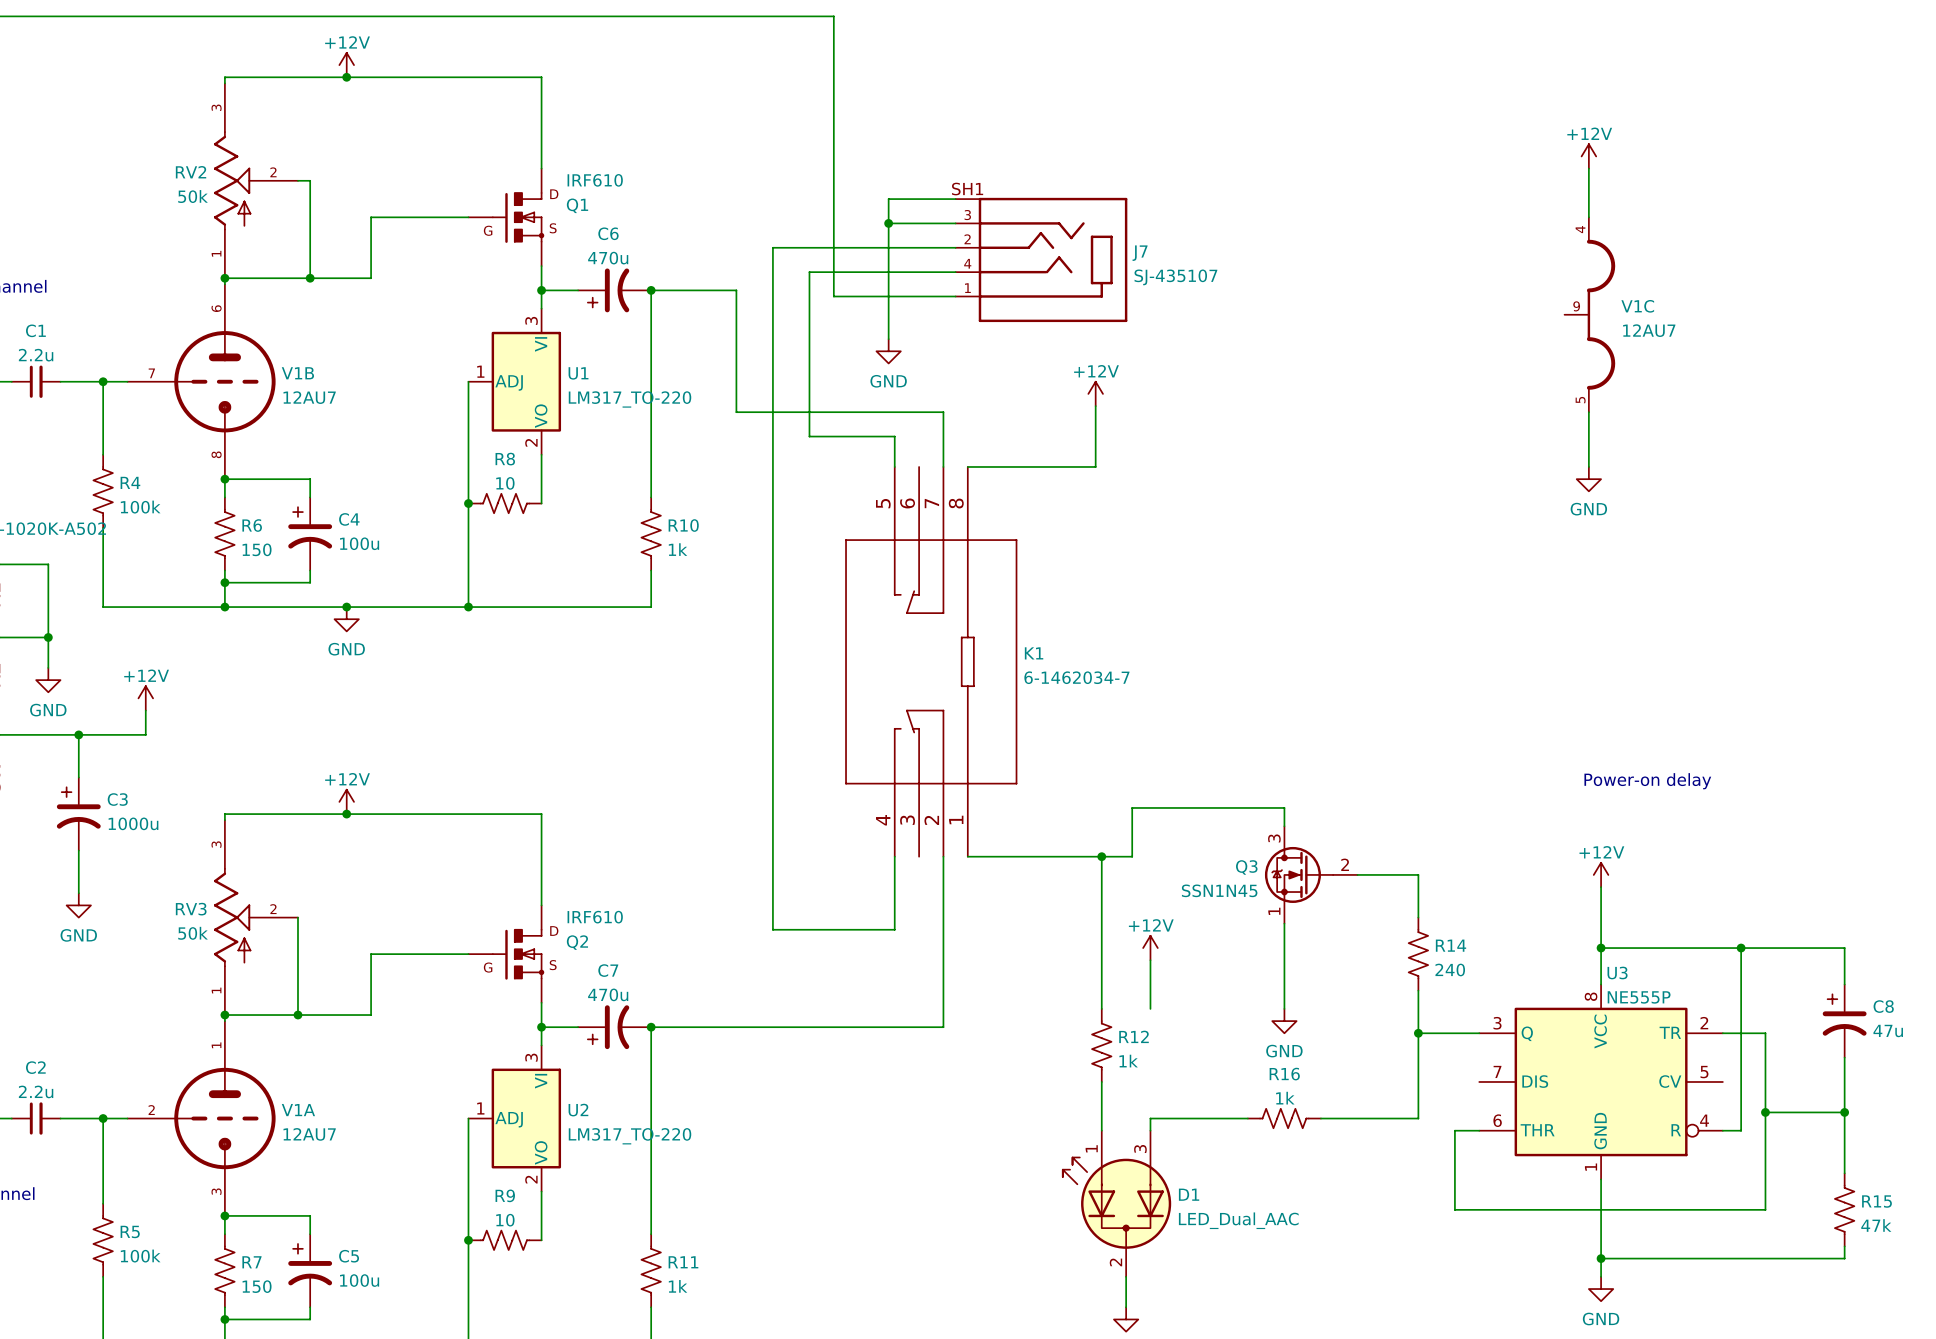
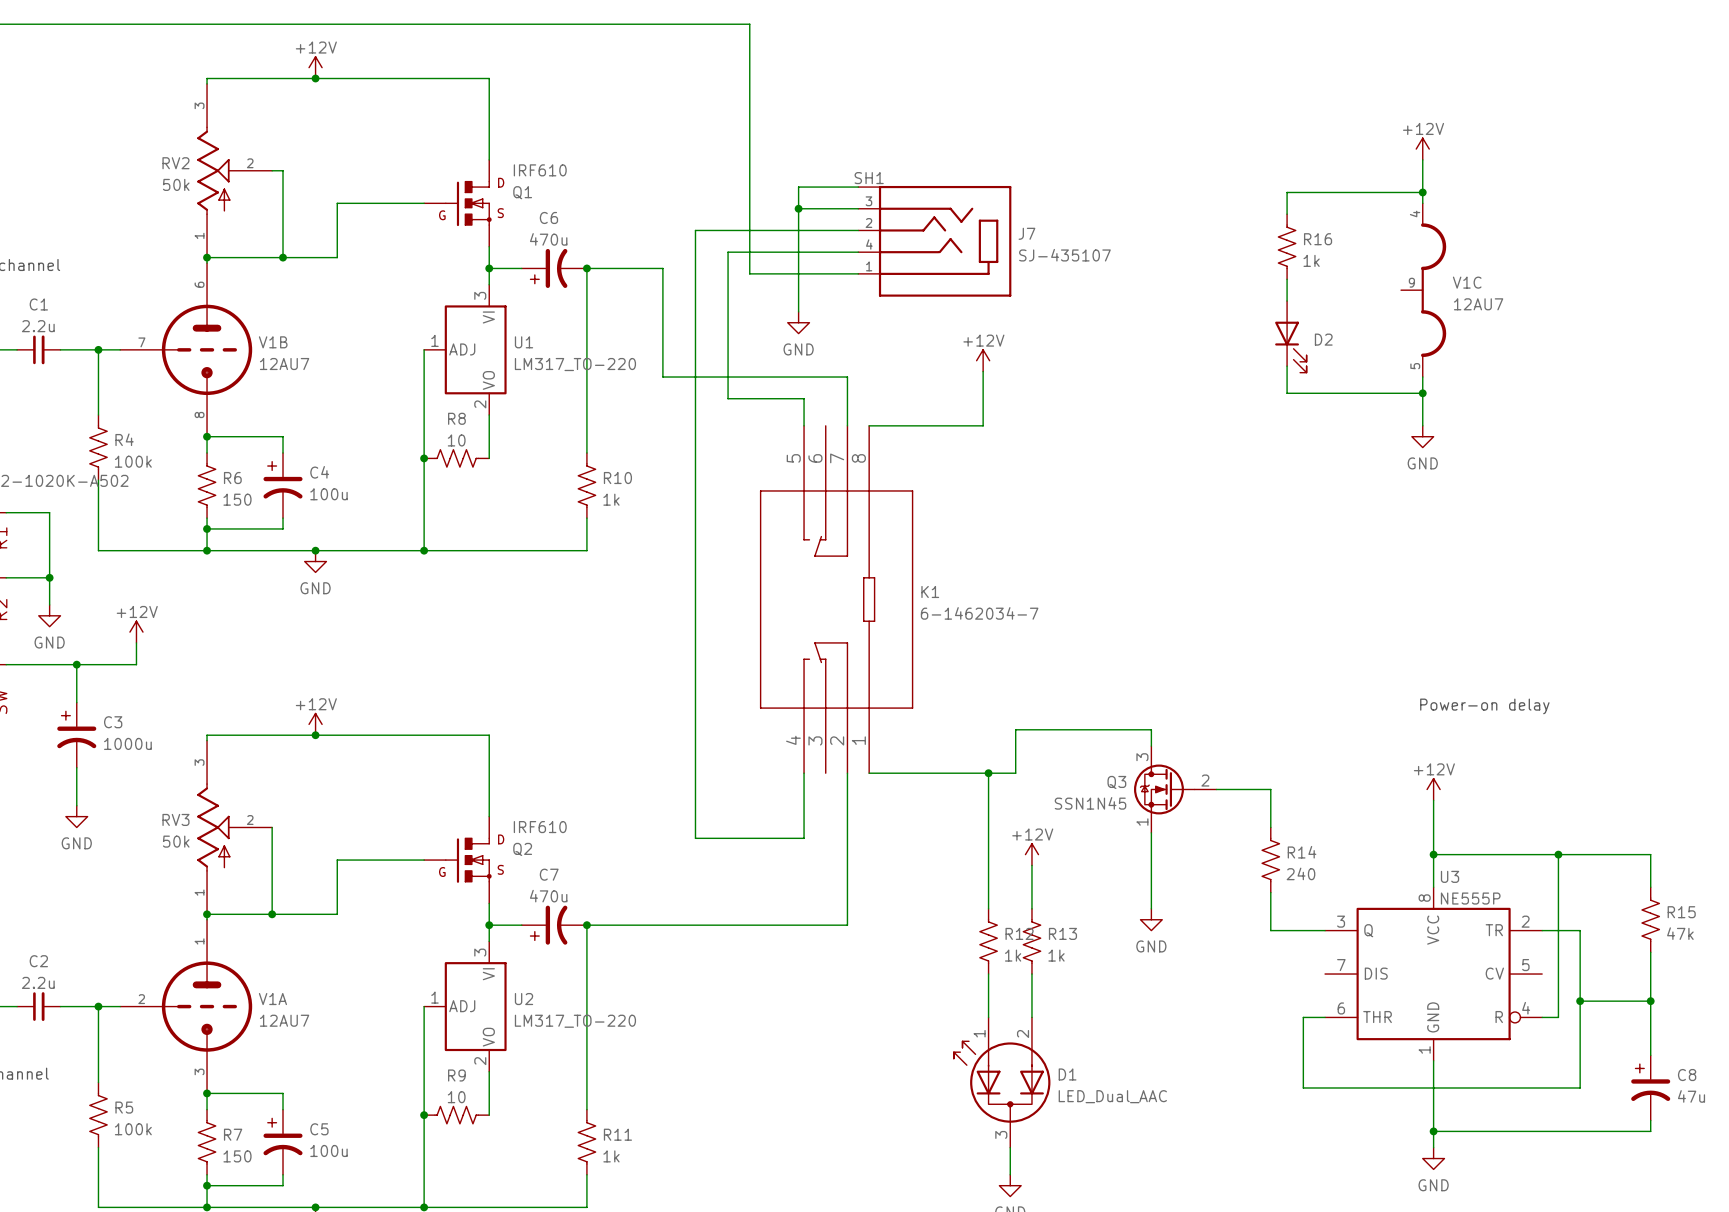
wire: none -> (1422, 192) (1287, 192) (1287, 214)
junction: none -> (1422, 192)
wire: none -> (1287, 279) (1287, 301)
D2: none -> (1290, 336)
wire: none -> (1287, 366) (1287, 393) (1422, 393)
junction: none -> (1422, 393)
C8 position: (1844, 1021) -> (1650, 1087)
wire: (1418, 1033) (1418, 1118) (1320, 1118) -> none
junction: (1418, 1033) -> none
R13: none -> 1k (1031, 941)
R16 value position: 1k (1285, 1098) -> 1k (1311, 260)
wire: (1150, 1118) (1247, 1118) -> (1031, 1006) (1031, 974)
R16 rotation: 0° (1284, 1118) -> 90° clockwise (1287, 246)
R16 position: (1284, 1118) -> (1287, 246)
D1 pin number: 3 (1140, 1149) -> 2 (1023, 1033)
R15 position: (1844, 1209) -> (1650, 919)
D1 pin number: 2 (1115, 1262) -> 3 (1001, 1134)

